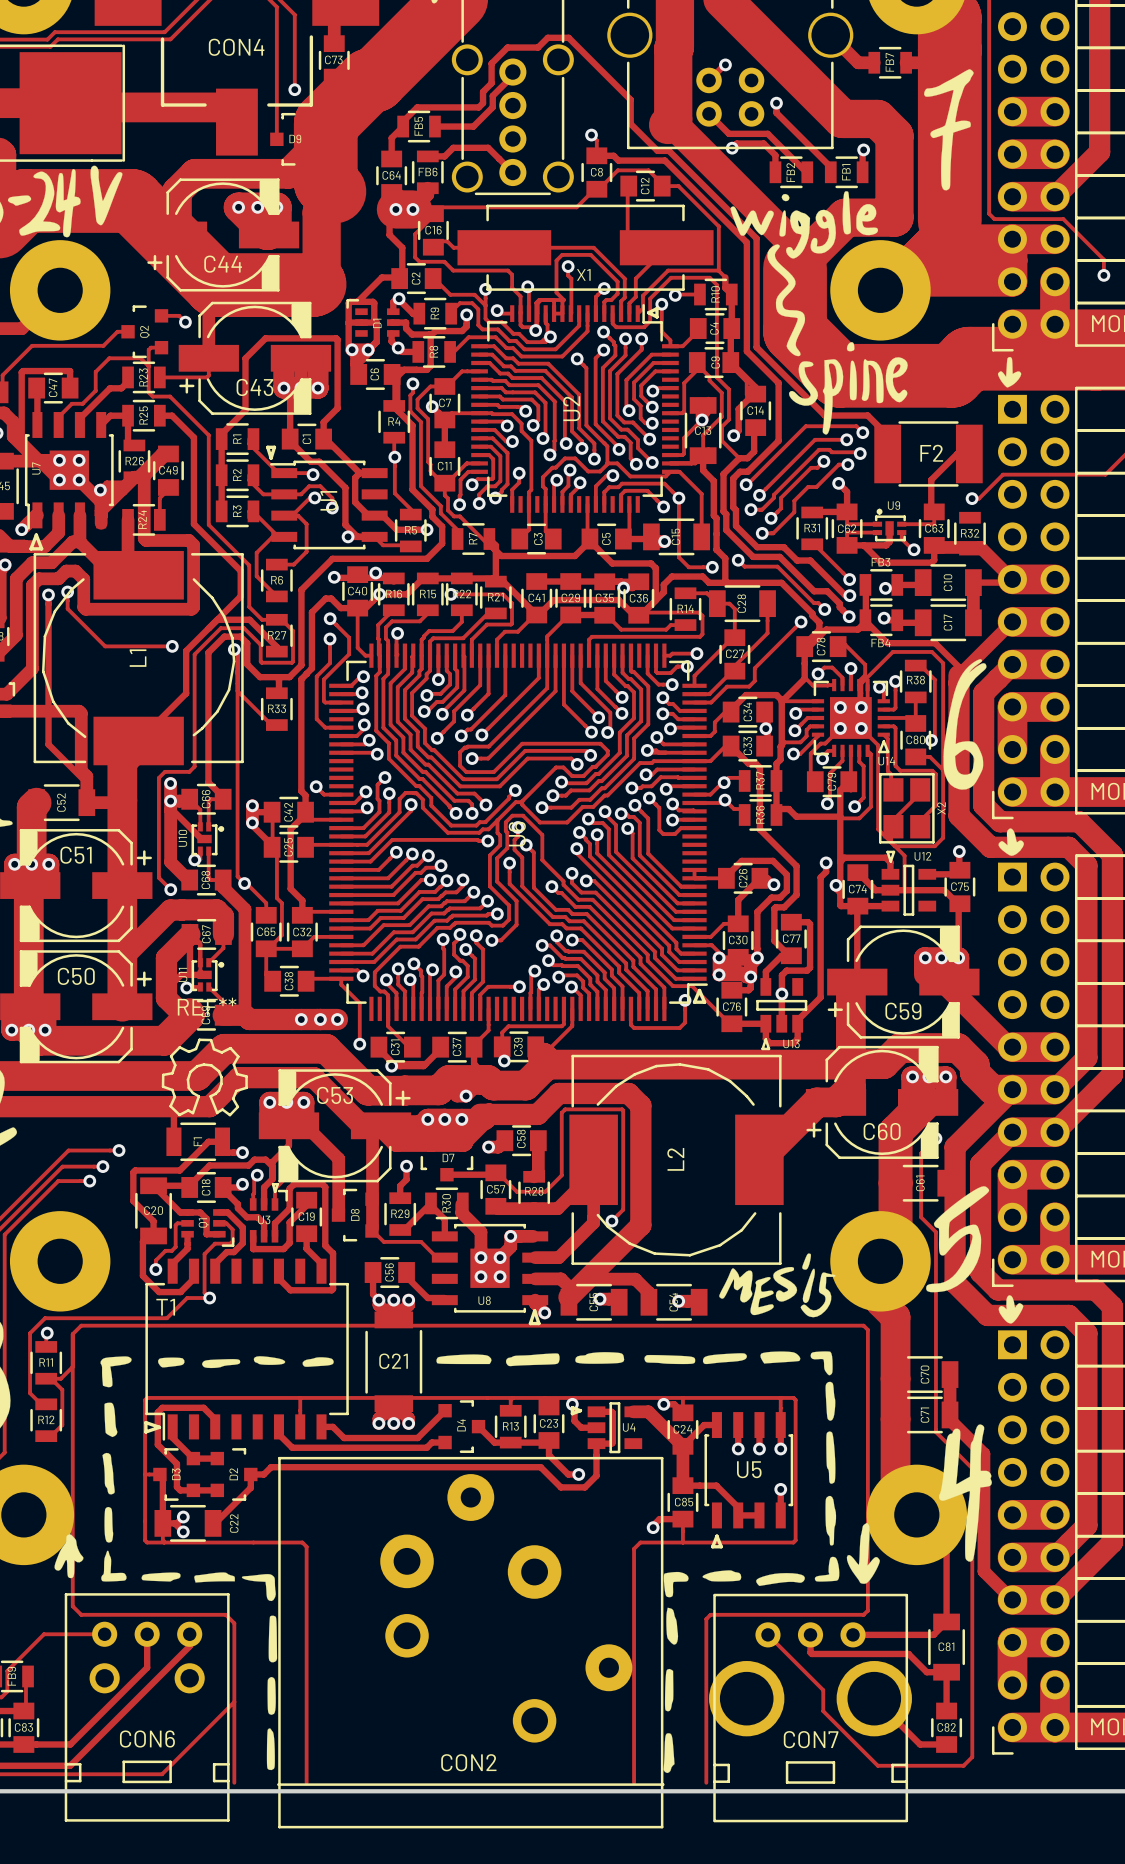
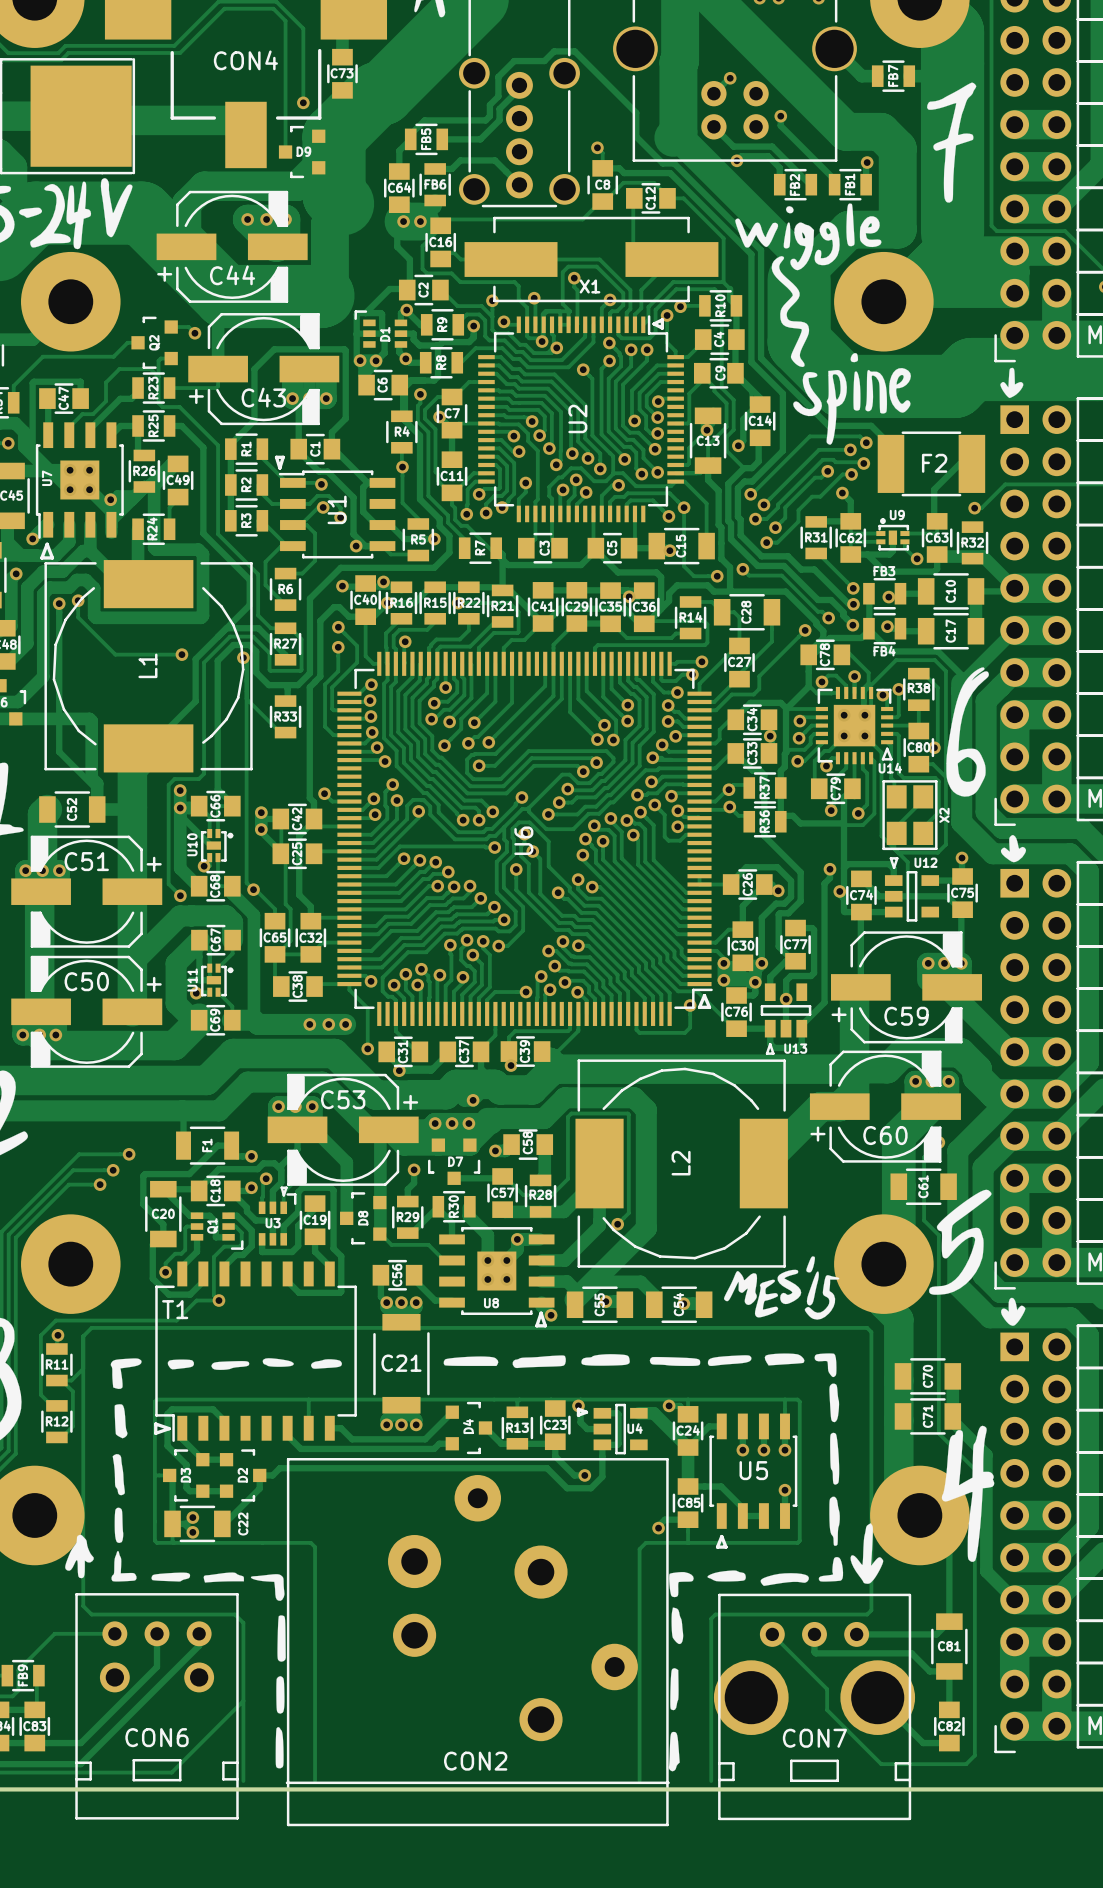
REF**: (204, 1077) -> none

